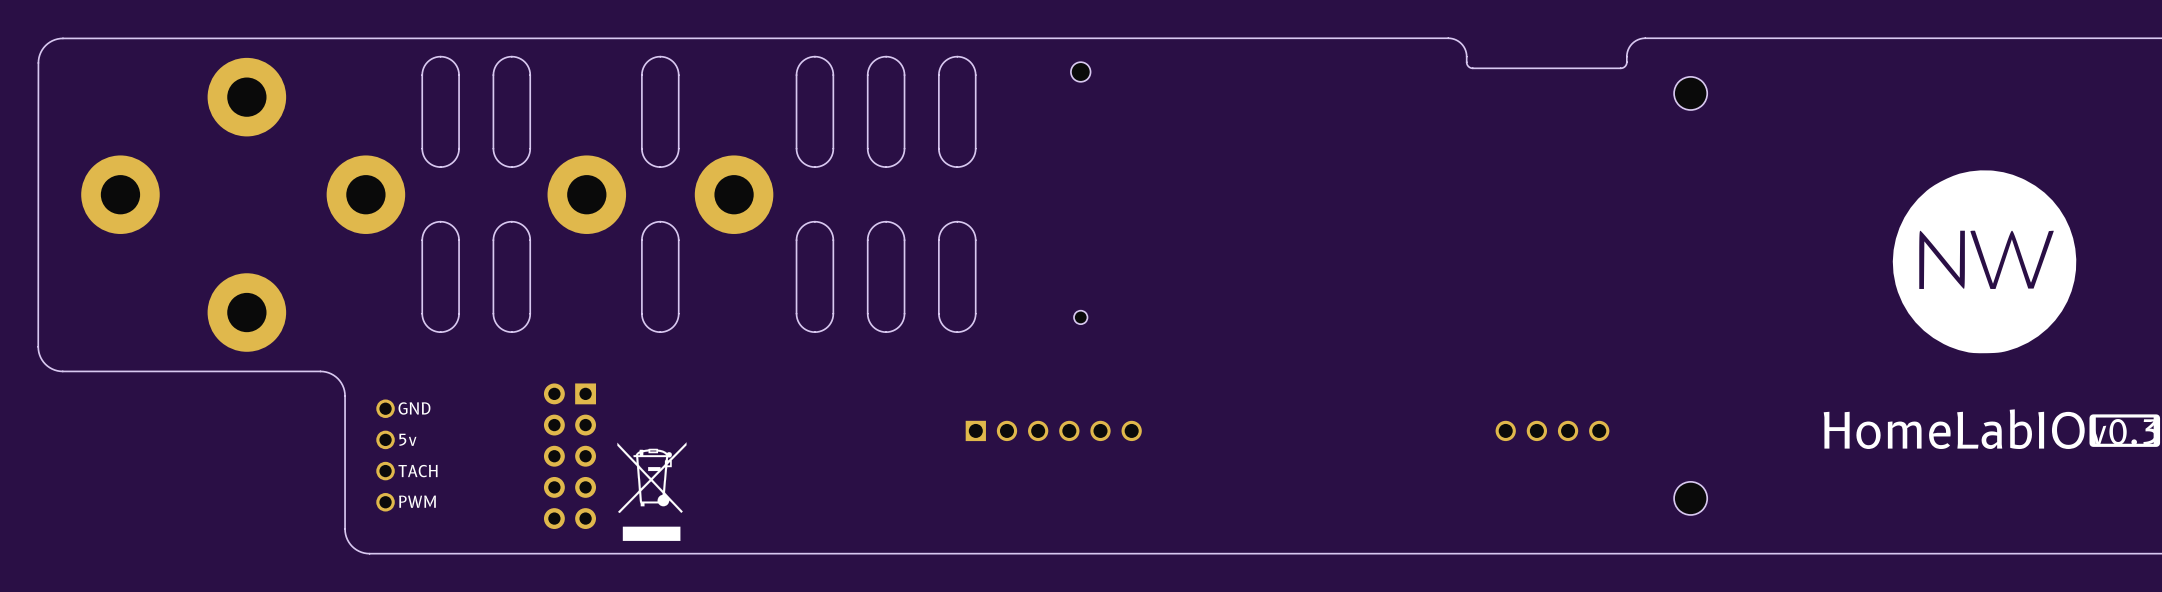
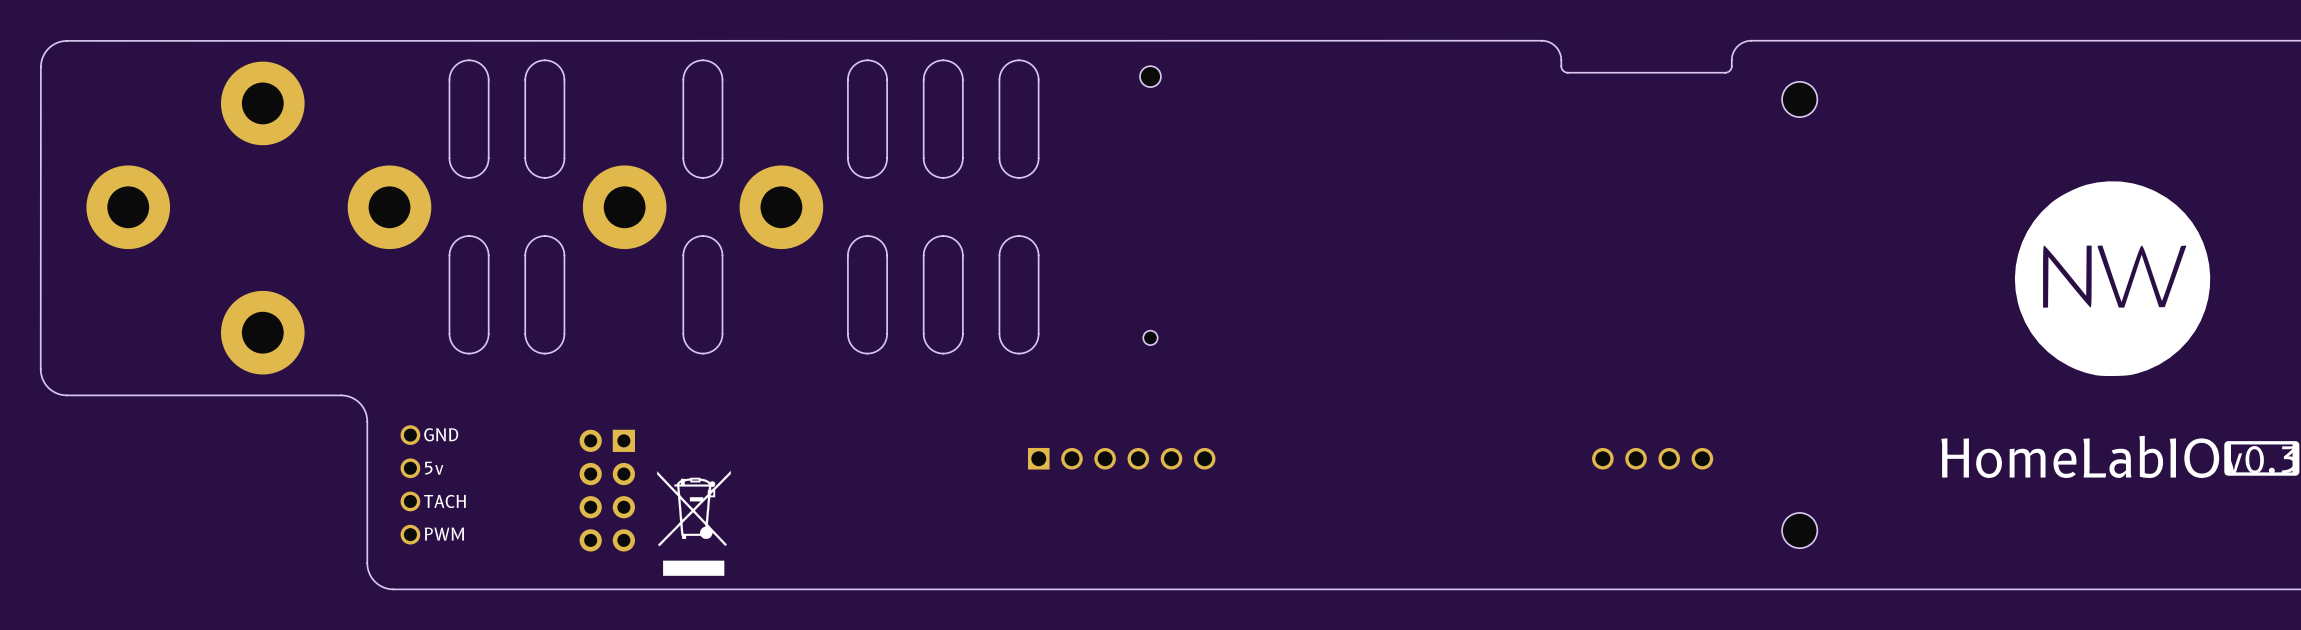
part footprint: [543, 383, 597, 530] -> [579, 429, 635, 552]

